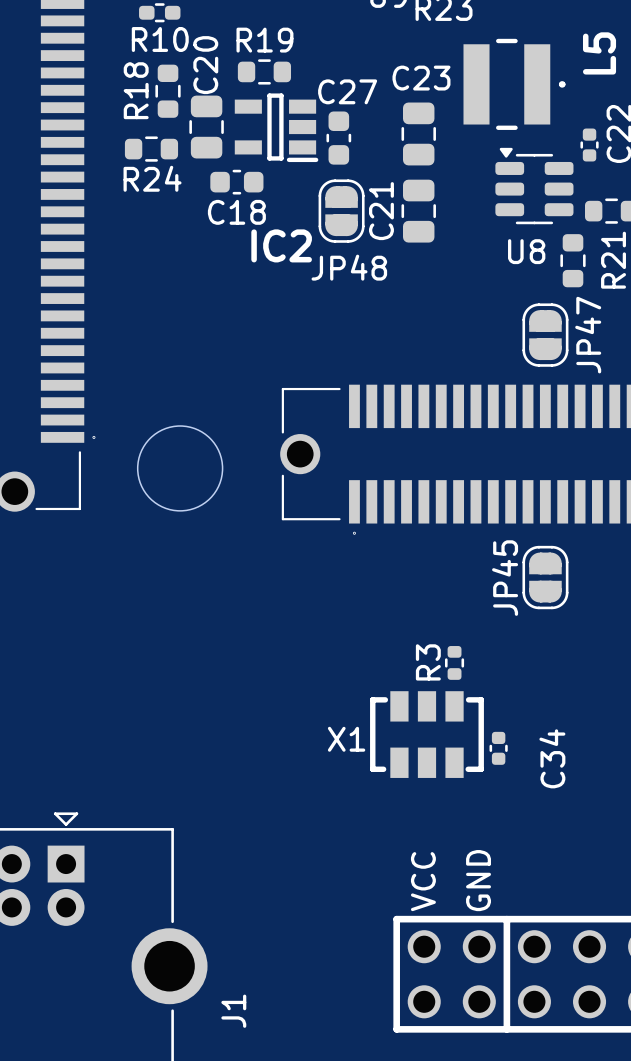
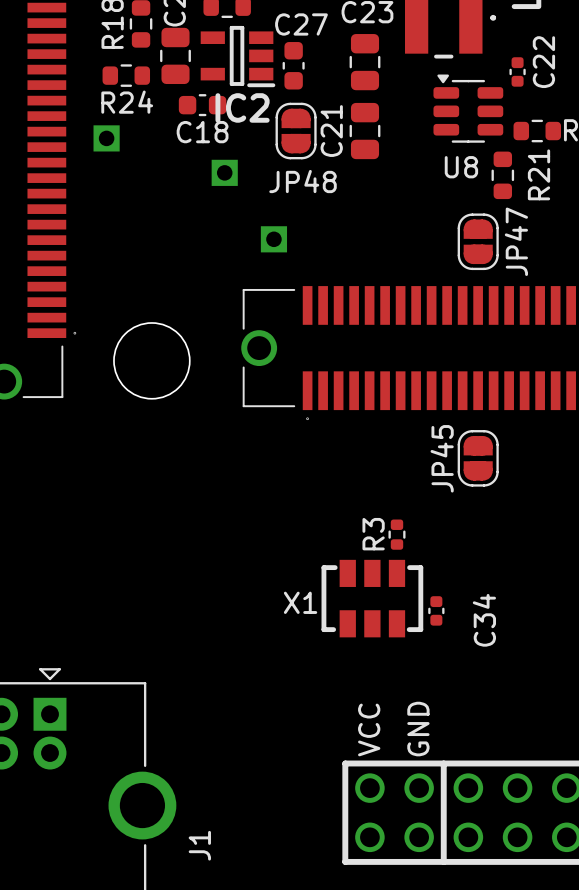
part: none -> (106, 138)
IC2 name position: IC2 (281, 245) -> IC2 (242, 107)
part: none -> (224, 172)
part: none -> (273, 239)

